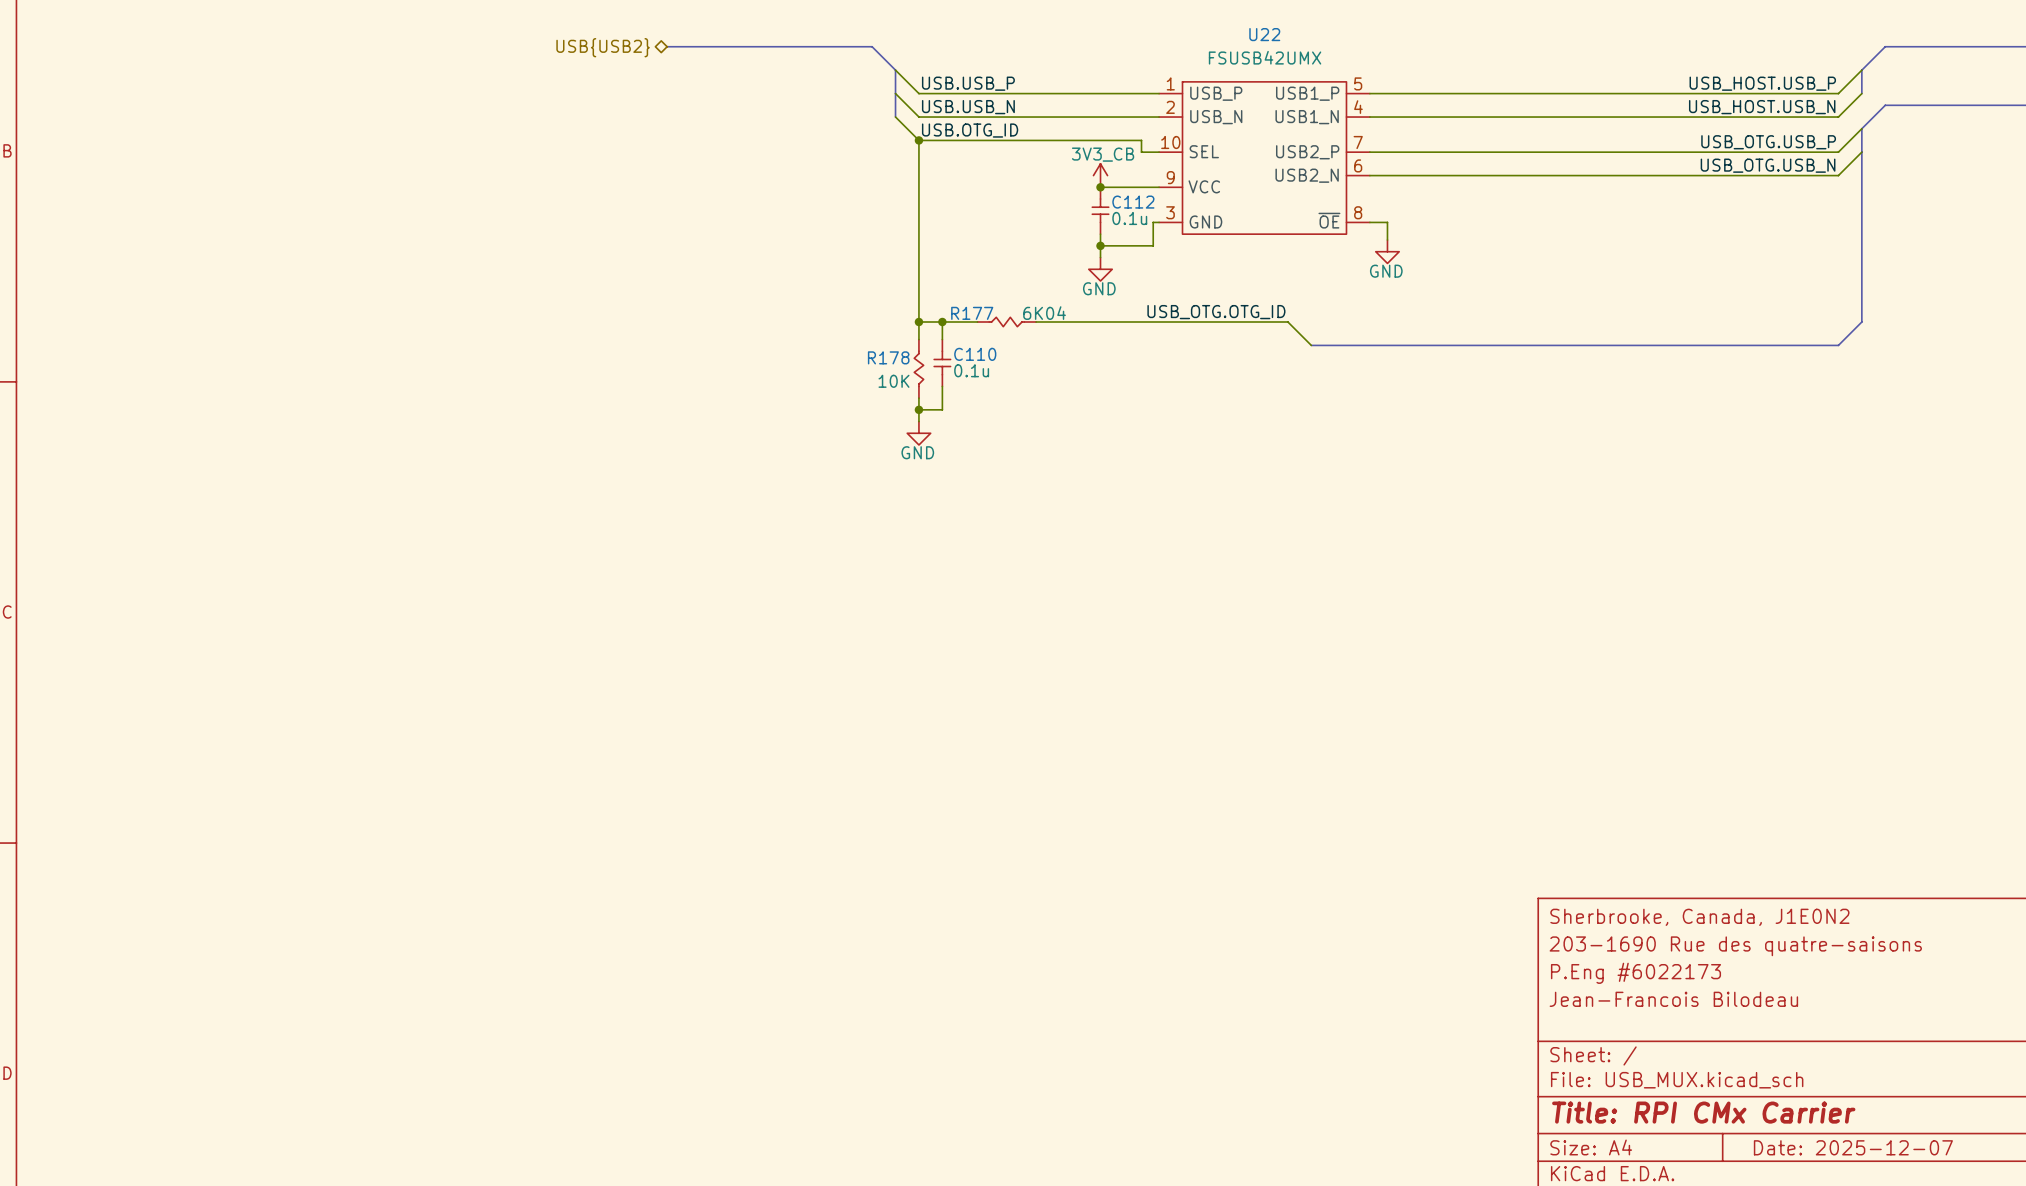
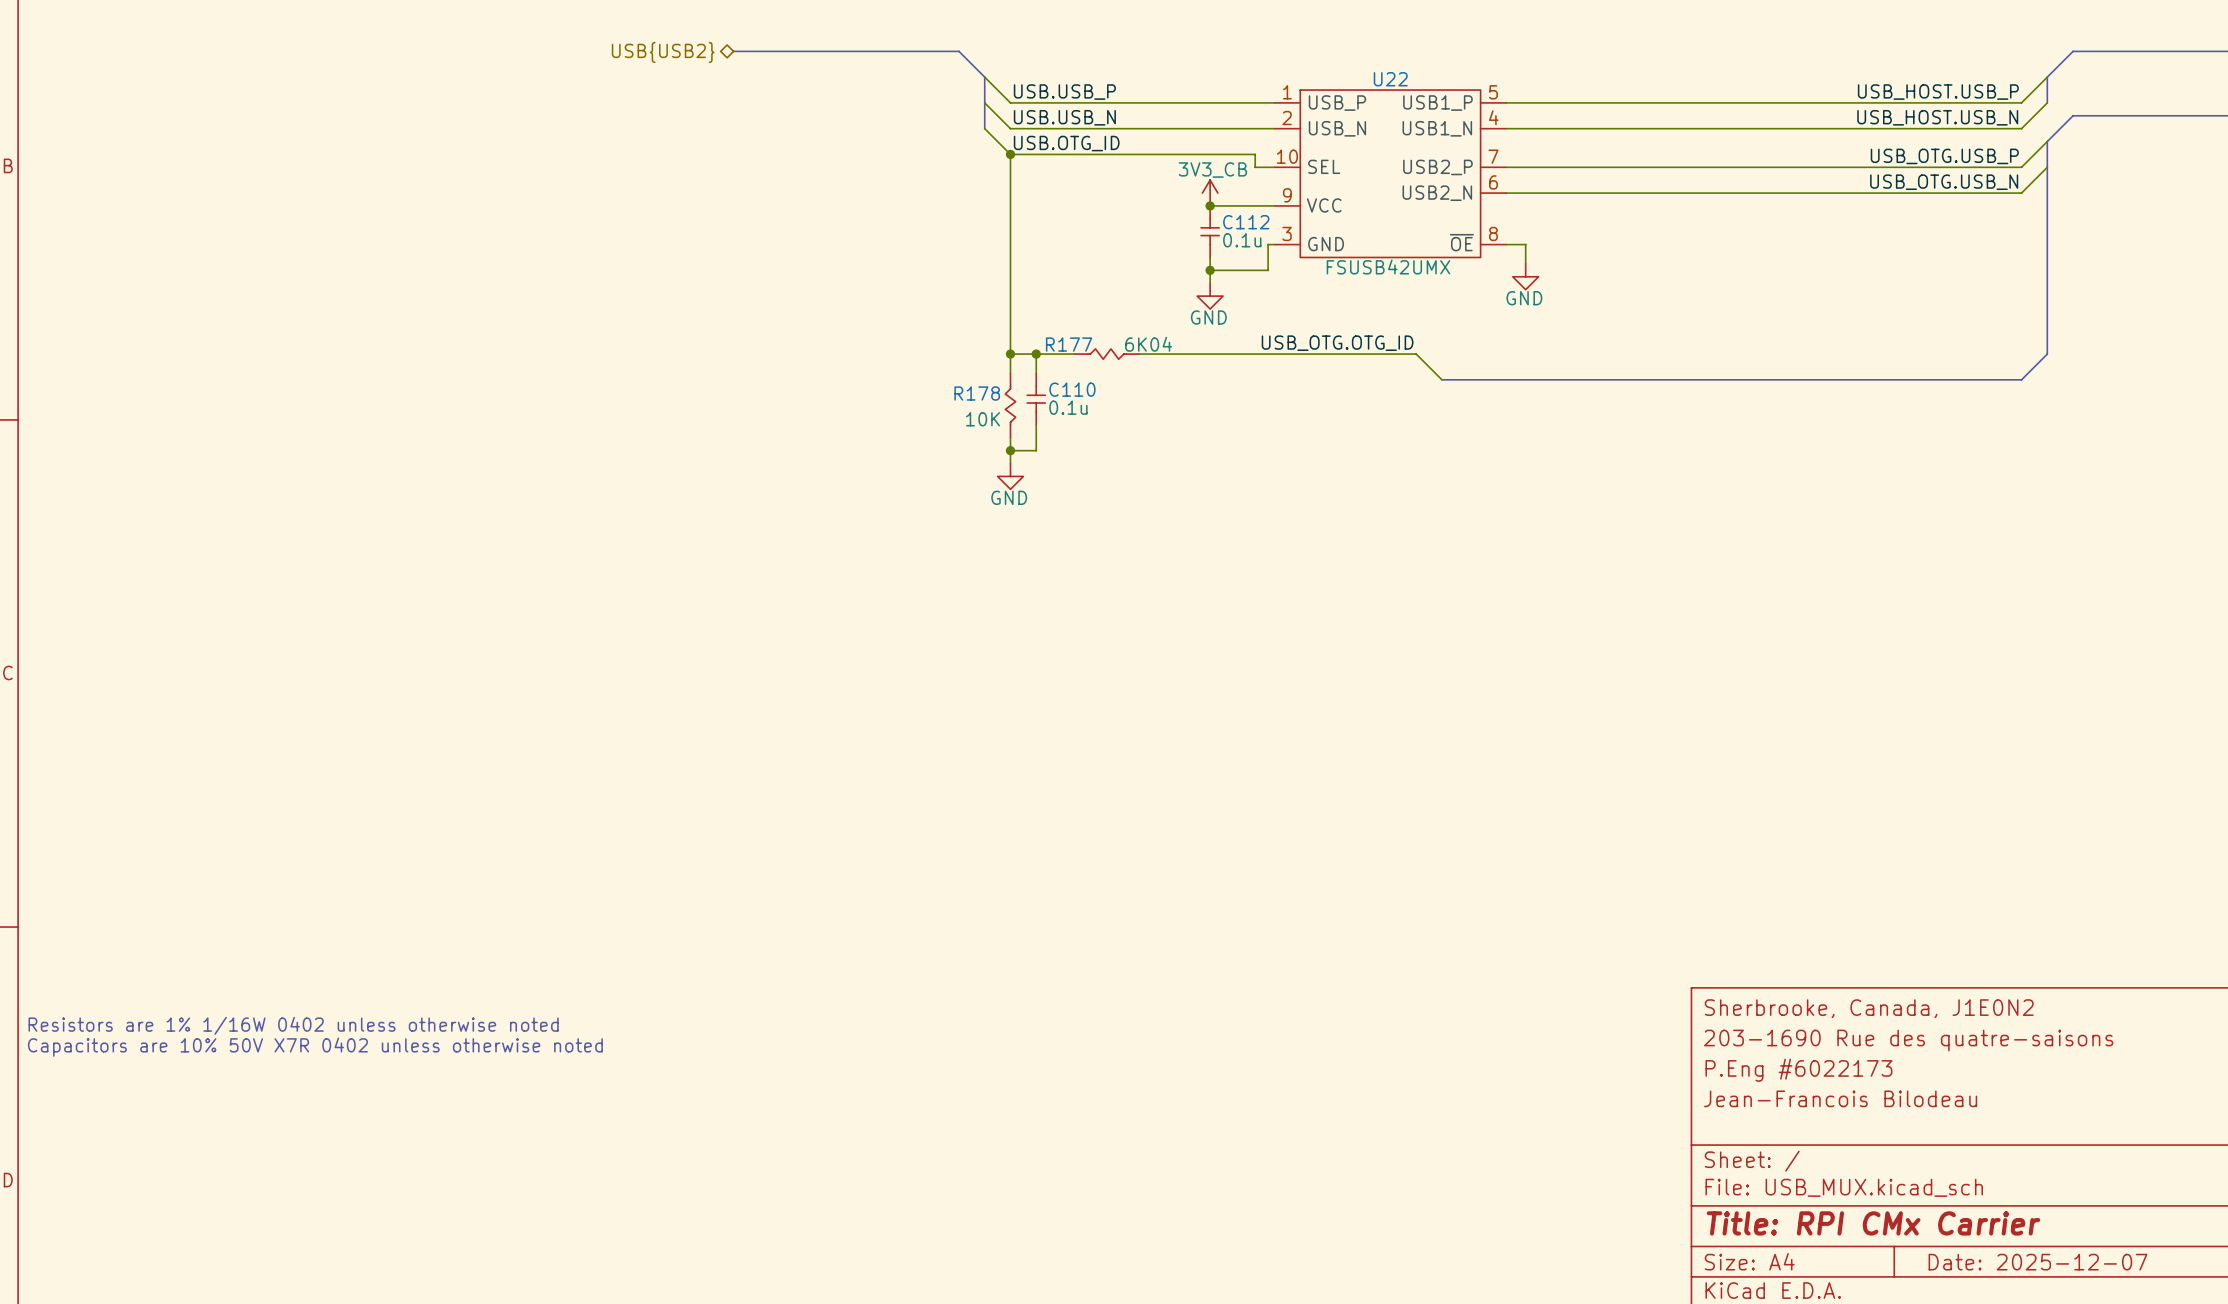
U22 name position: U22 (1264, 34) -> U22 (1390, 79)
U22 value position: FSUSB42UMX (1265, 57) -> FSUSB42UMX (1388, 266)
text: none -> Resistors are 1% 1/16W 0402 unless otherwise noted (293, 1025)
text: none -> Capacitors are 10% 50V X7R 0402 unless otherwise noted (315, 1047)

